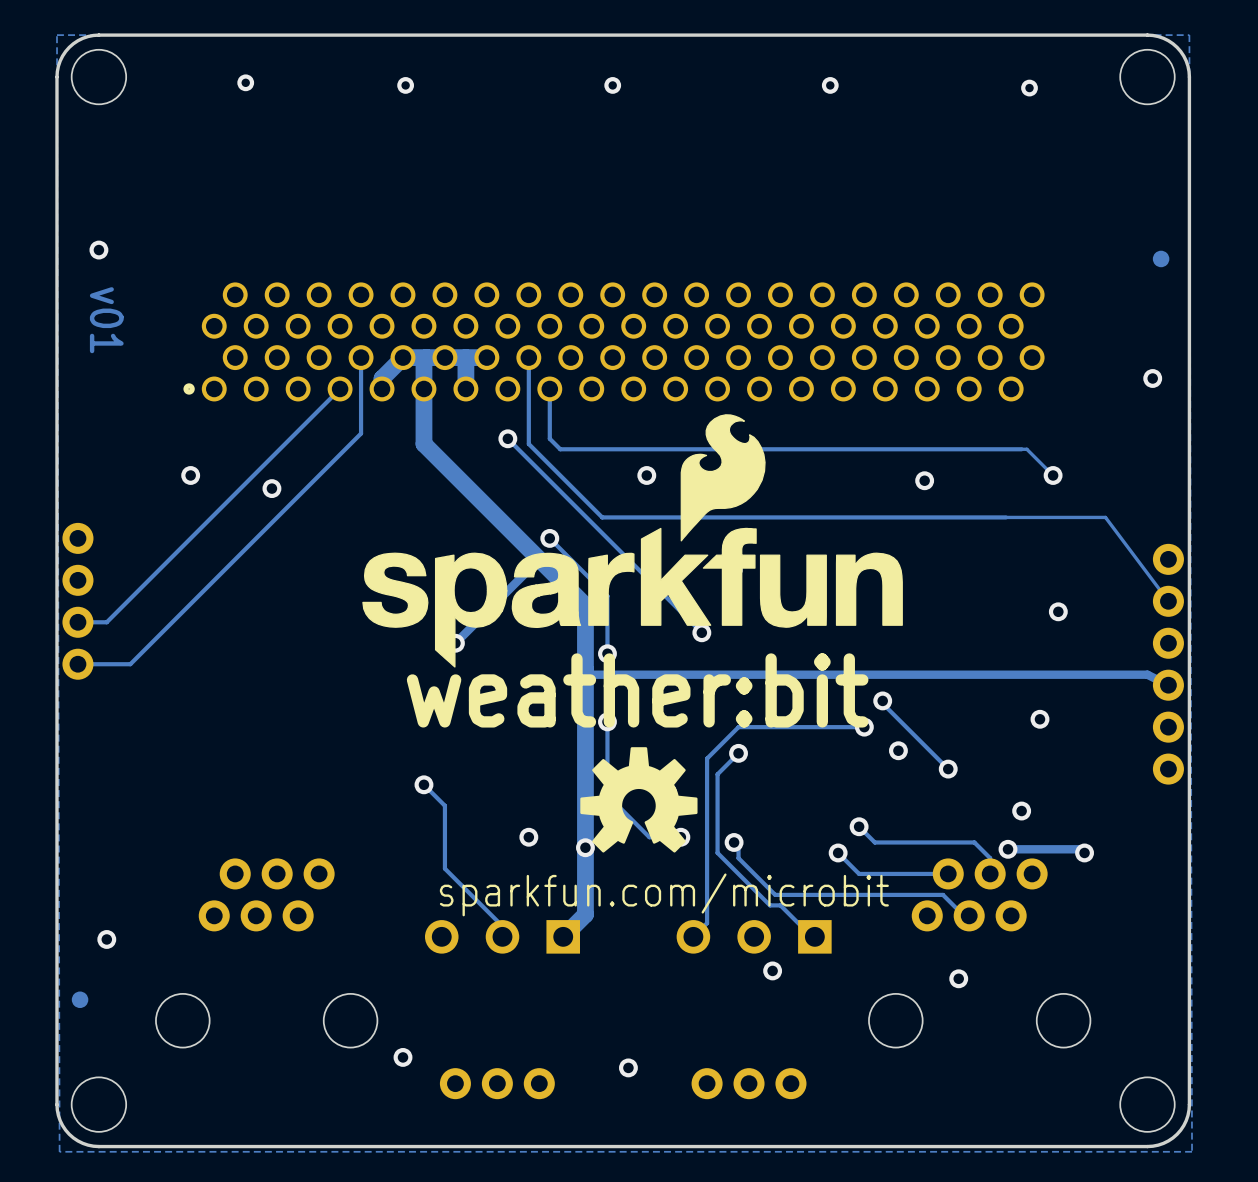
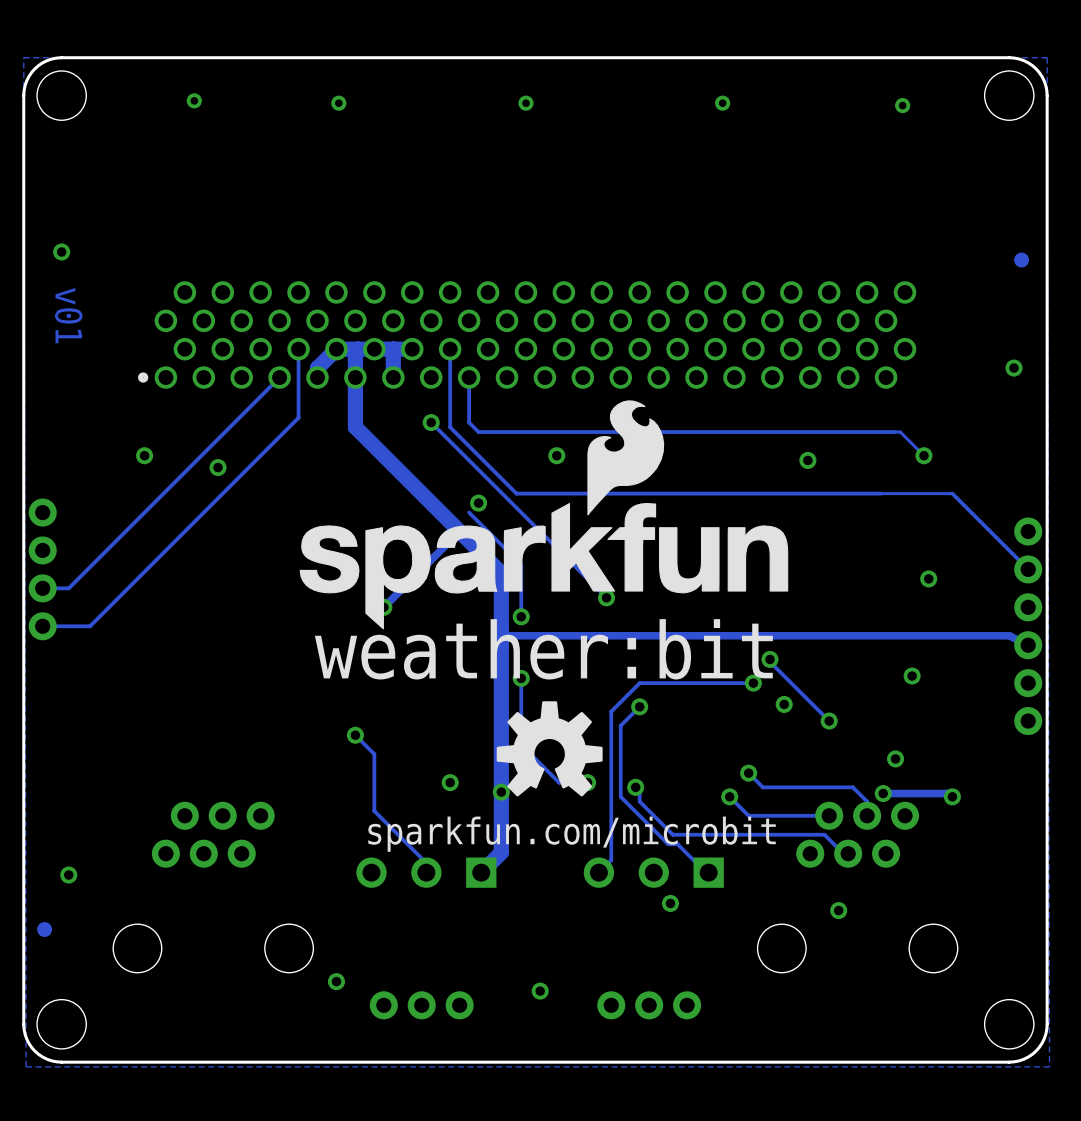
track: (1084, 517) (1105, 517) (1168, 601) -> (952, 493) (1028, 569)
via position: (549, 538) -> (478, 503)

